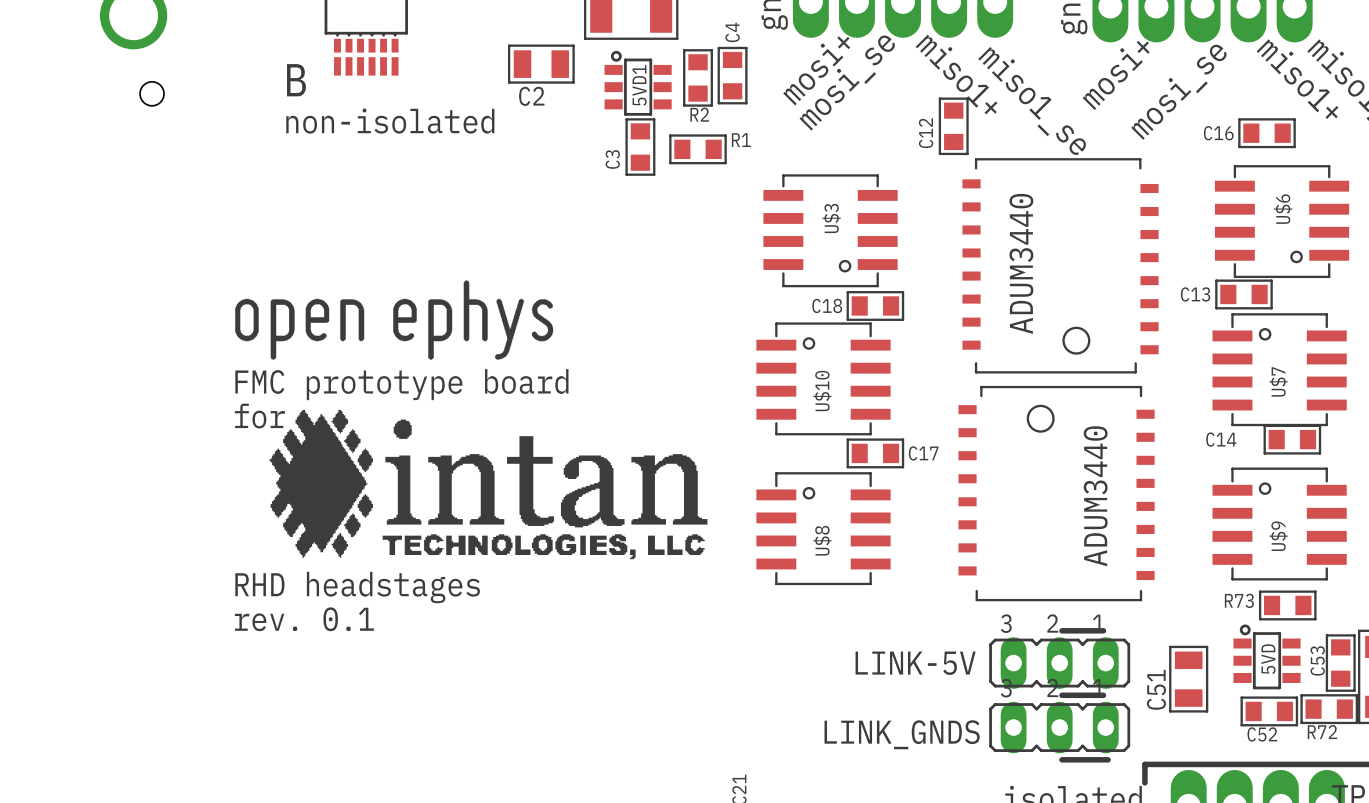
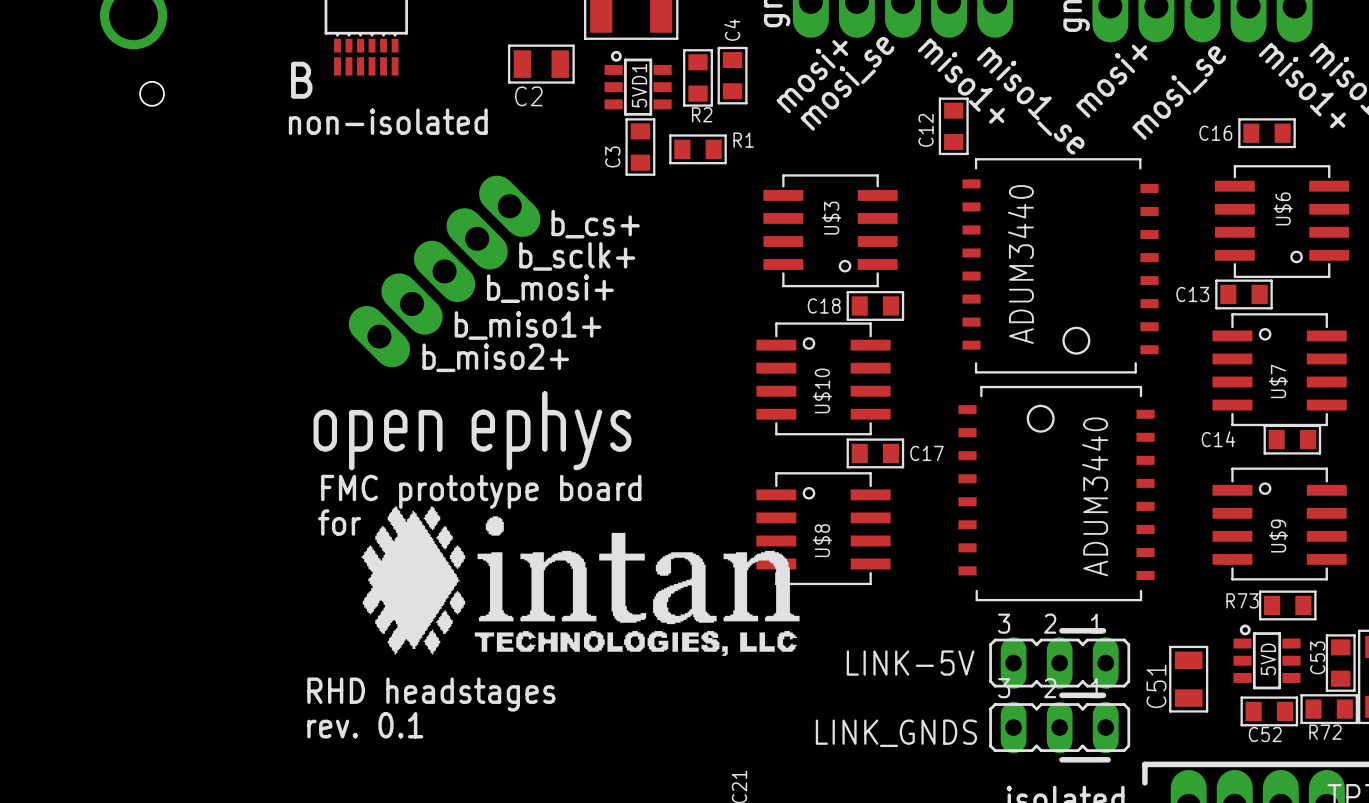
text: none -> b_cs+ (595, 224)
text: none -> b_sclk+ (577, 256)
part: none -> (444, 271)
text: none -> b_mosi+ (550, 288)
drawing position: (394, 320) -> (472, 430)
text: none -> b_miso1+ (528, 325)
text: none -> b_miso2+ (495, 357)
text position: FMC prototype board (401, 384) -> FMC prototype board (481, 491)
text position: for (259, 416) -> for (339, 522)
drawing position: (488, 484) -> (580, 581)
text position: RHD headstages (357, 587) -> RHD headstages (431, 694)
text position: rev. 0.1 (304, 619) -> rev. 0.1 (365, 725)

